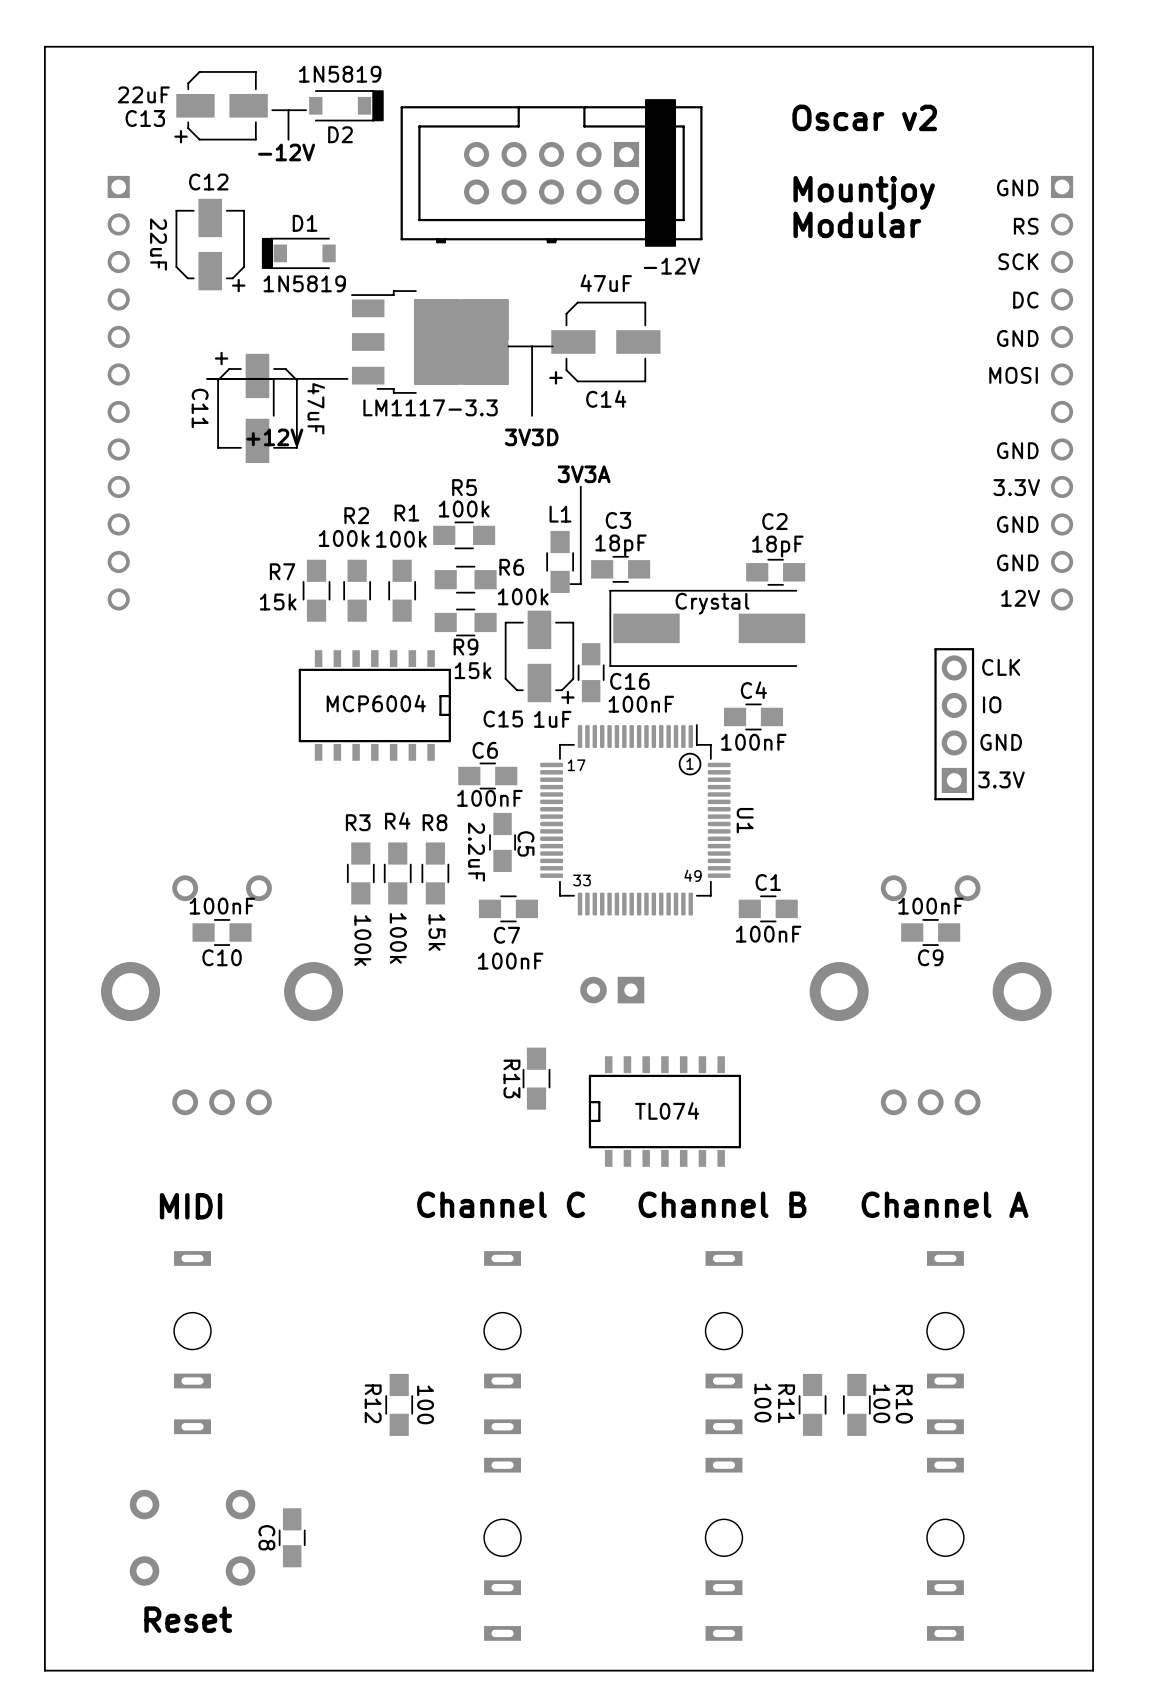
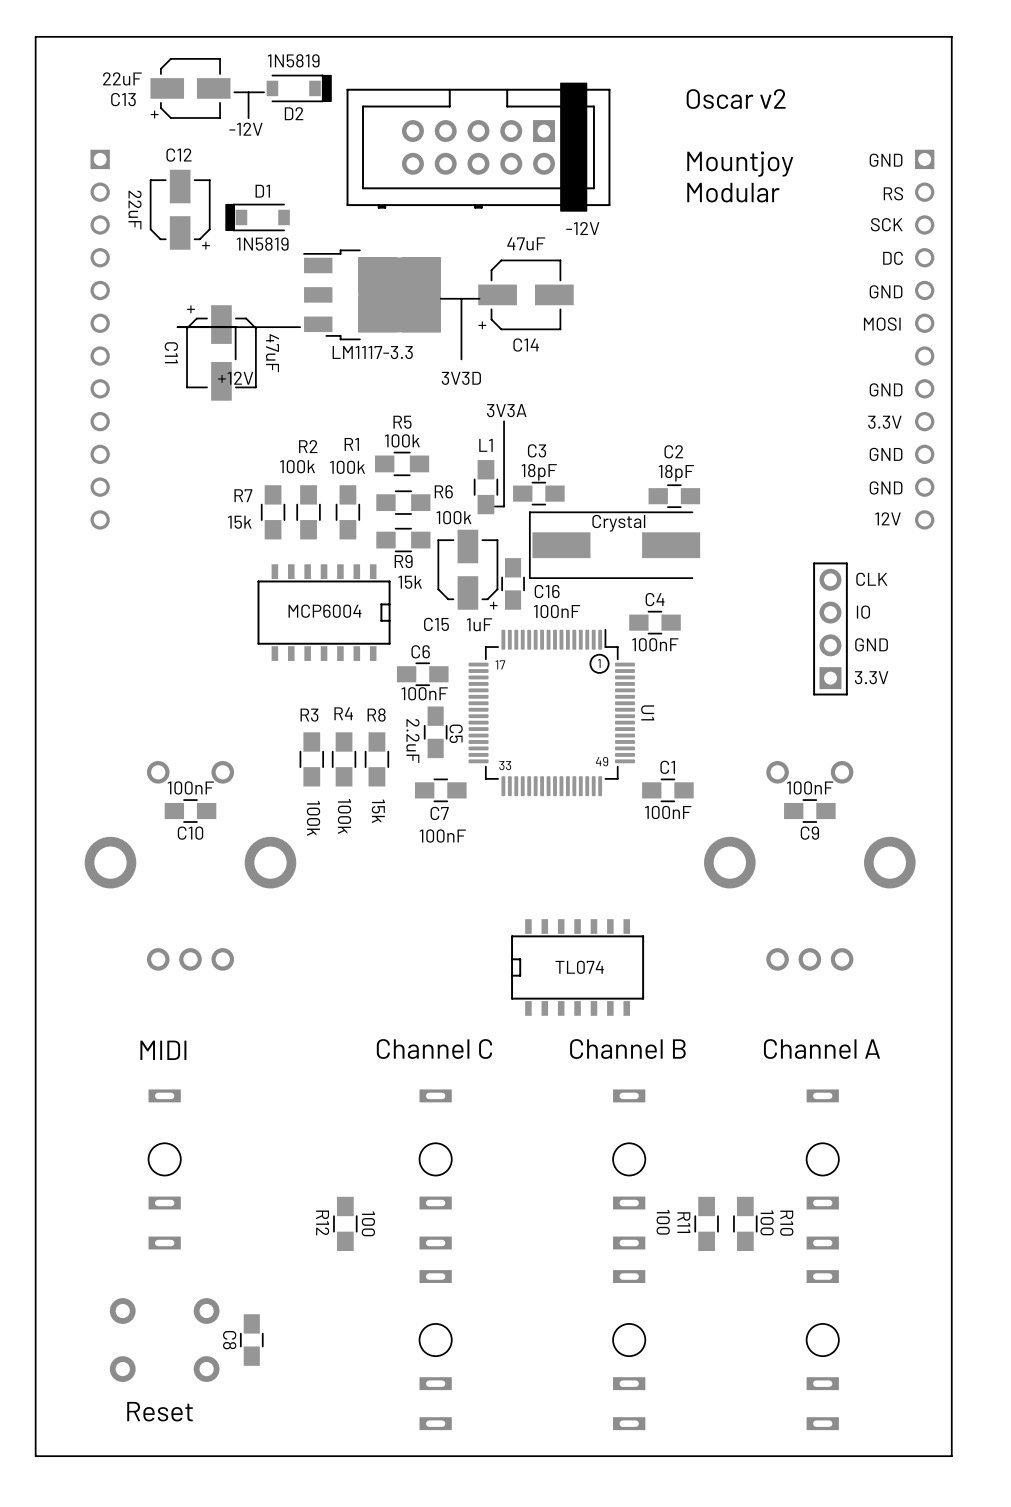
part: (612, 990) -> none
R13: (536, 1078) -> none

